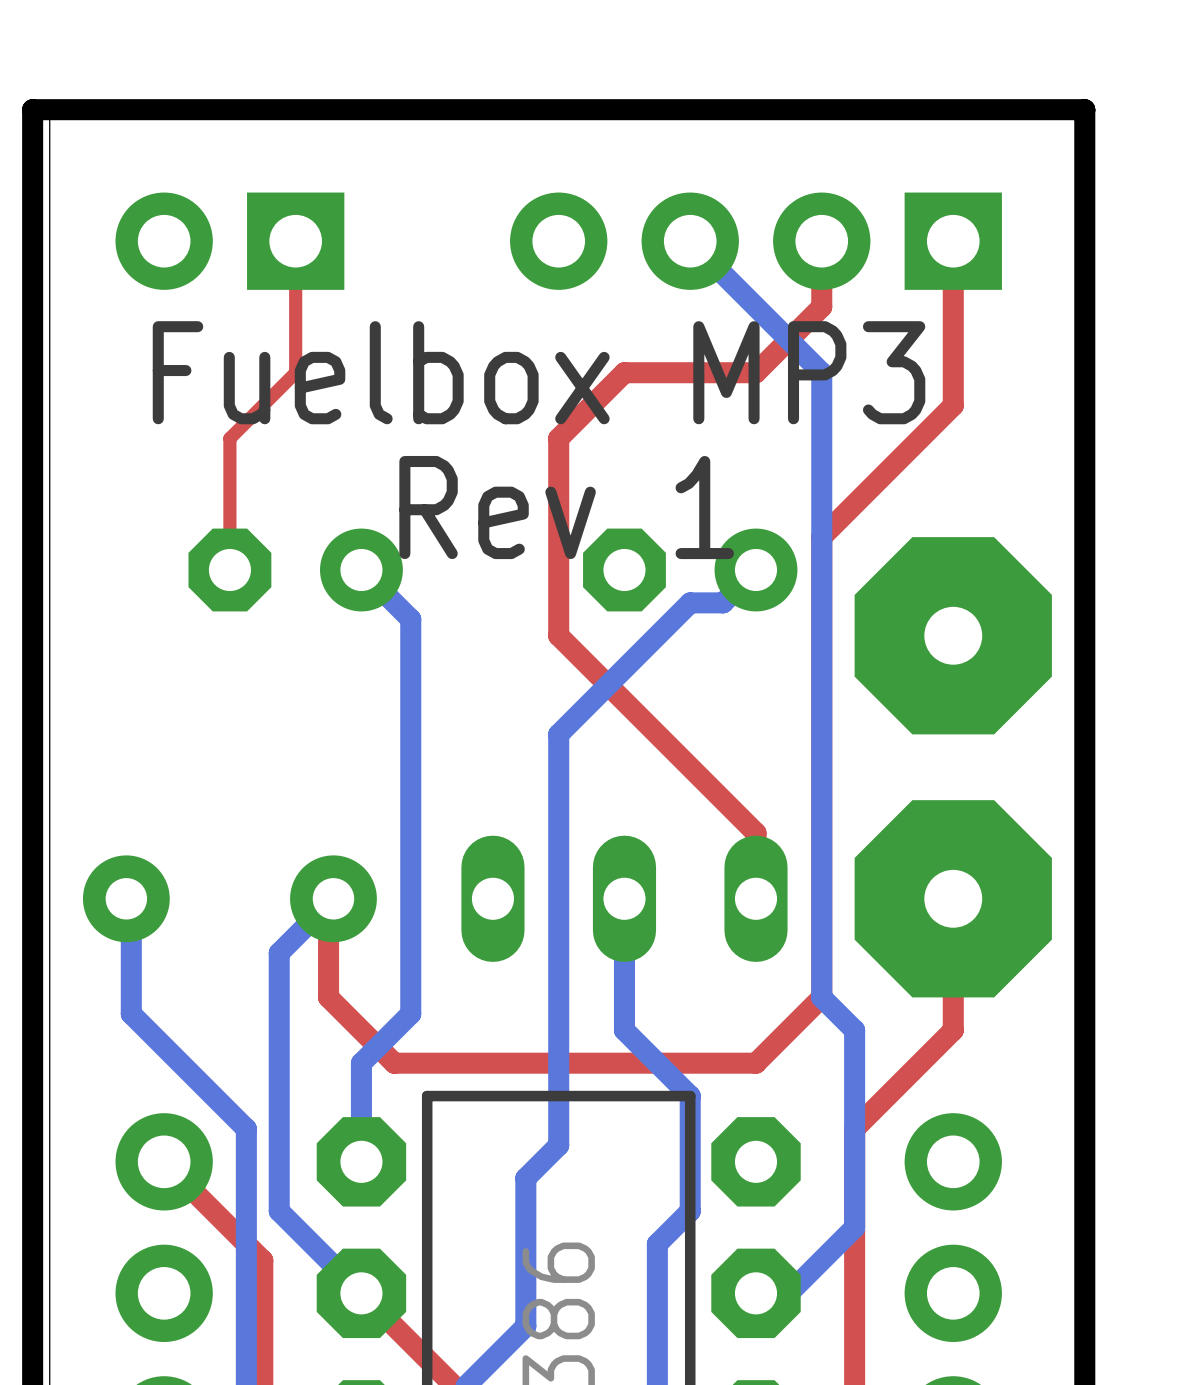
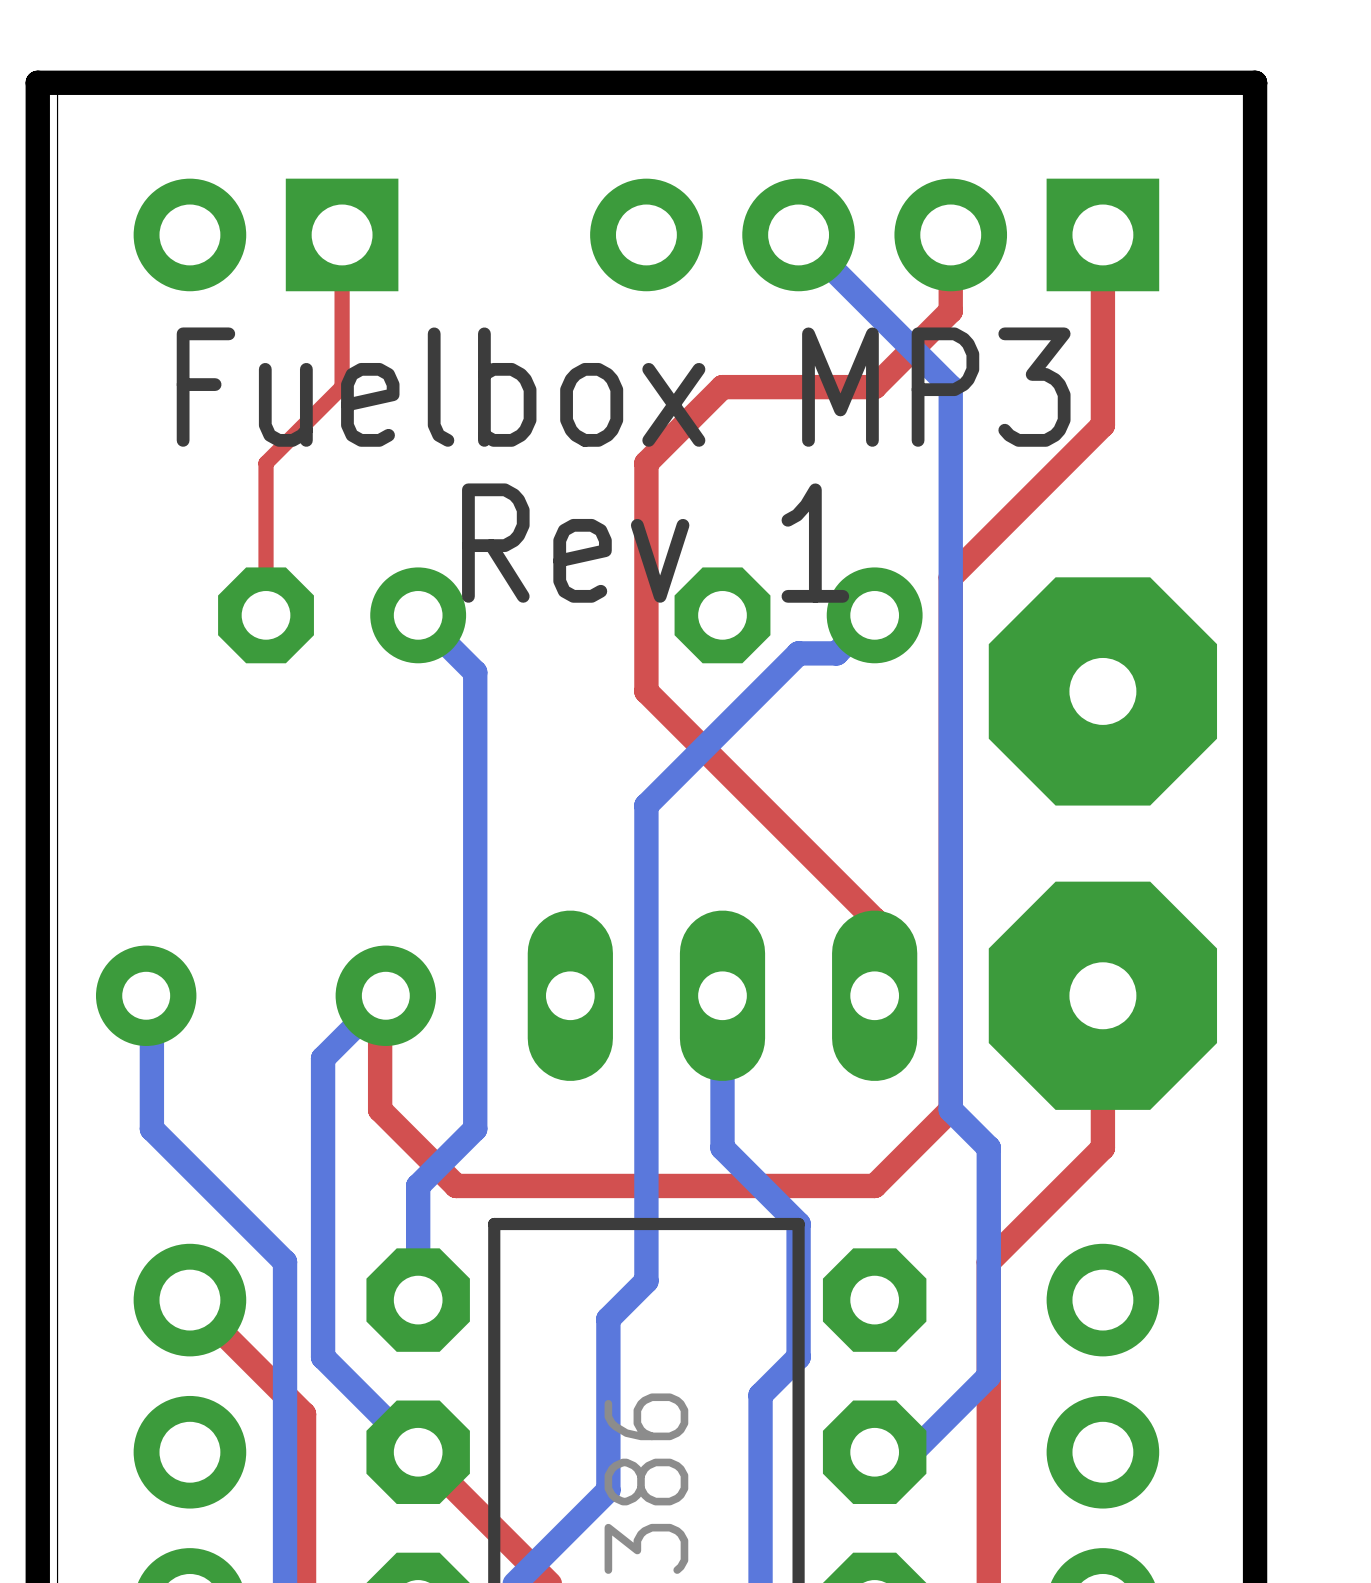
part footprint: [461, 835, 788, 962] -> [527, 910, 918, 1081]

